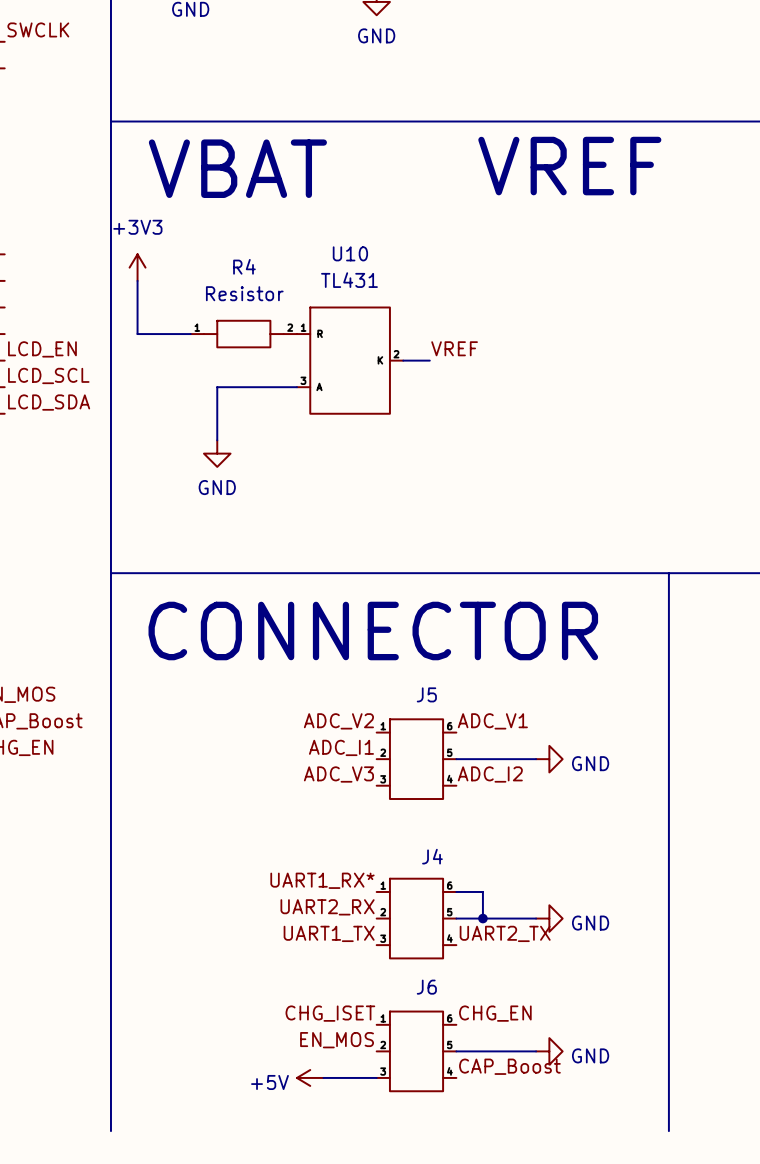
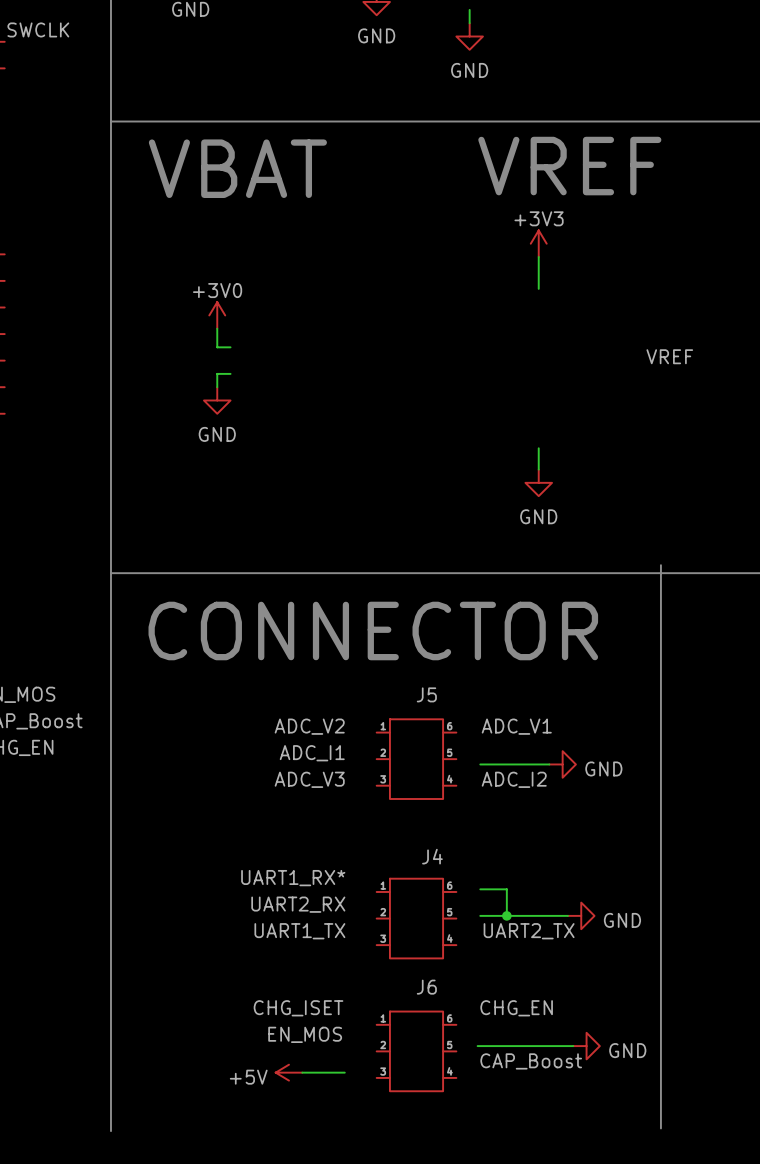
wire: none -> (469, 9) (469, 23)
power symbol: none -> GND (469, 36)
power symbol: none -> +3V3 (538, 243)
wire: none -> (538, 257) (538, 288)
power symbol: +3V3 (137, 267) -> none
wire: (137, 280) (137, 334) (190, 334) -> none
power symbol: none -> +3V0 (217, 315)
R4: Resistor (243, 334) -> none
label position: VREF (454, 348) -> VREF (669, 356)
label: LCD_EN (42, 349) -> none
U10: TL431 (350, 360) -> none
wire: (403, 360) (429, 360) -> none
wire: none -> (230, 373) (217, 373) (217, 387)
label: LCD_SCL (48, 375) -> none
wire: (296, 387) (217, 387) (217, 440) -> none
label: LCD_SDA (49, 402) -> none
wire: none -> (538, 448) (538, 469)
power symbol position: GND (217, 453) -> GND (217, 400)
power symbol: none -> GND (538, 482)
line: none -> (660, 565) (660, 1128)
line: (668, 573) (668, 1131) -> none
label position: ADC_V2 (338, 721) -> ADC_V2 (309, 726)
label position: ADC_V1 (492, 721) -> ADC_V1 (516, 726)
label position: ADC_I1 (341, 747) -> ADC_I1 (312, 753)
wire: (456, 759) (536, 759) -> none
power symbol position: GND (549, 759) -> GND (562, 764)
wire: none -> (480, 764) (549, 764)
label position: ADC_V3 (338, 774) -> ADC_V3 (309, 779)
label position: ADC_I2 (490, 774) -> ADC_I2 (514, 779)
label position: UART1_RX* (322, 880) -> UART1_RX* (293, 878)
wire: (456, 891) (482, 891) (482, 918) -> (480, 889) (506, 889) (506, 915)
label position: UART2_RX (327, 907) -> UART2_RX (298, 904)
wire: none -> (480, 915) (567, 915)
wire: (456, 918) (536, 918) -> none
junction position: (482, 918) -> (506, 915)
power symbol position: GND (549, 918) -> GND (581, 915)
label position: UART1_TX (329, 933) -> UART1_TX (299, 931)
label position: UART2_TX (505, 933) -> UART2_TX (529, 931)
label position: CHG_ISET (330, 1013) -> CHG_ISET (298, 1008)
label position: CHG_EN (495, 1013) -> CHG_EN (516, 1008)
label position: EN_MOS (337, 1040) -> EN_MOS (305, 1034)
wire: none -> (477, 1046) (573, 1046)
wire: (456, 1051) (536, 1051) -> none
power symbol position: GND (549, 1051) -> GND (586, 1046)
label position: CAP_Boost (509, 1066) -> CAP_Boost (531, 1061)
wire: none -> (302, 1072) (344, 1072)
power symbol position: +5V (310, 1077) -> +5V (288, 1072)
wire: (323, 1077) (376, 1077) -> none

